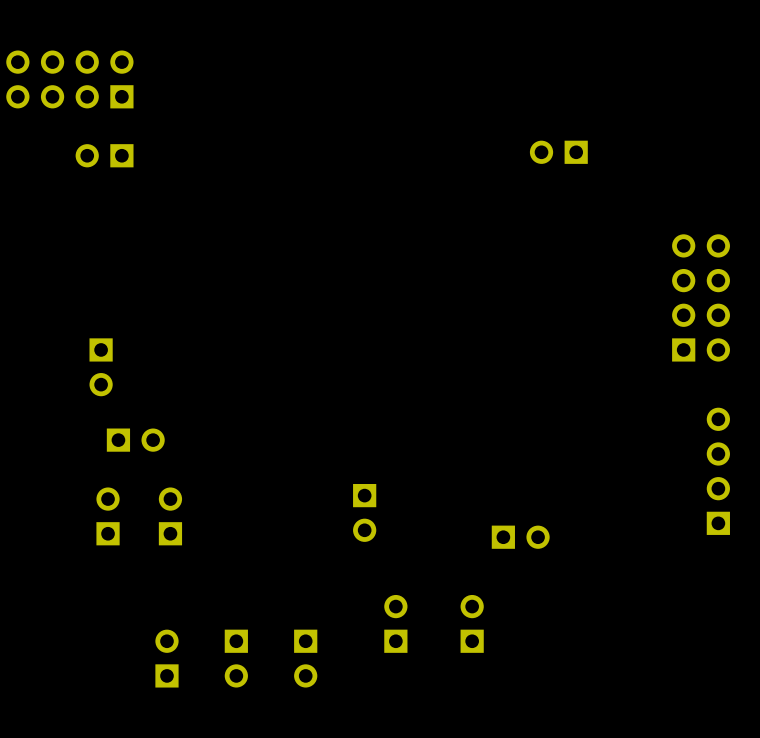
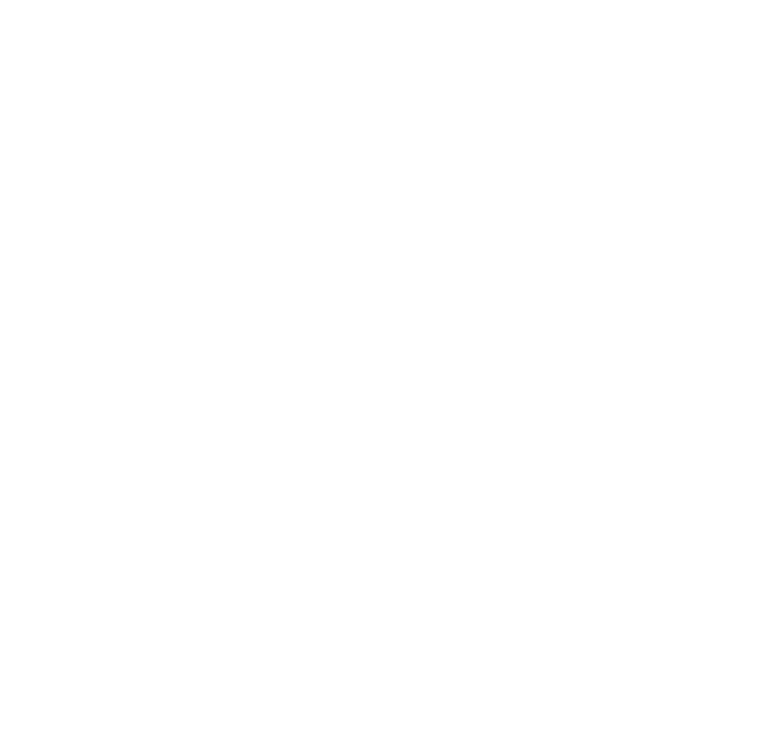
part: (69, 79) -> none
part: (558, 152) -> none
part: (104, 155) -> none
part: (701, 297) -> none
part: (101, 367) -> none
part: (135, 440) -> none
part: (718, 471) -> none
part: (364, 512) -> none
part: (108, 516) -> none
part: (170, 516) -> none
part: (520, 537) -> none
part: (395, 623) -> none
part: (472, 623) -> none
part: (166, 658) -> none
part: (236, 658) -> none
part: (305, 658) -> none

